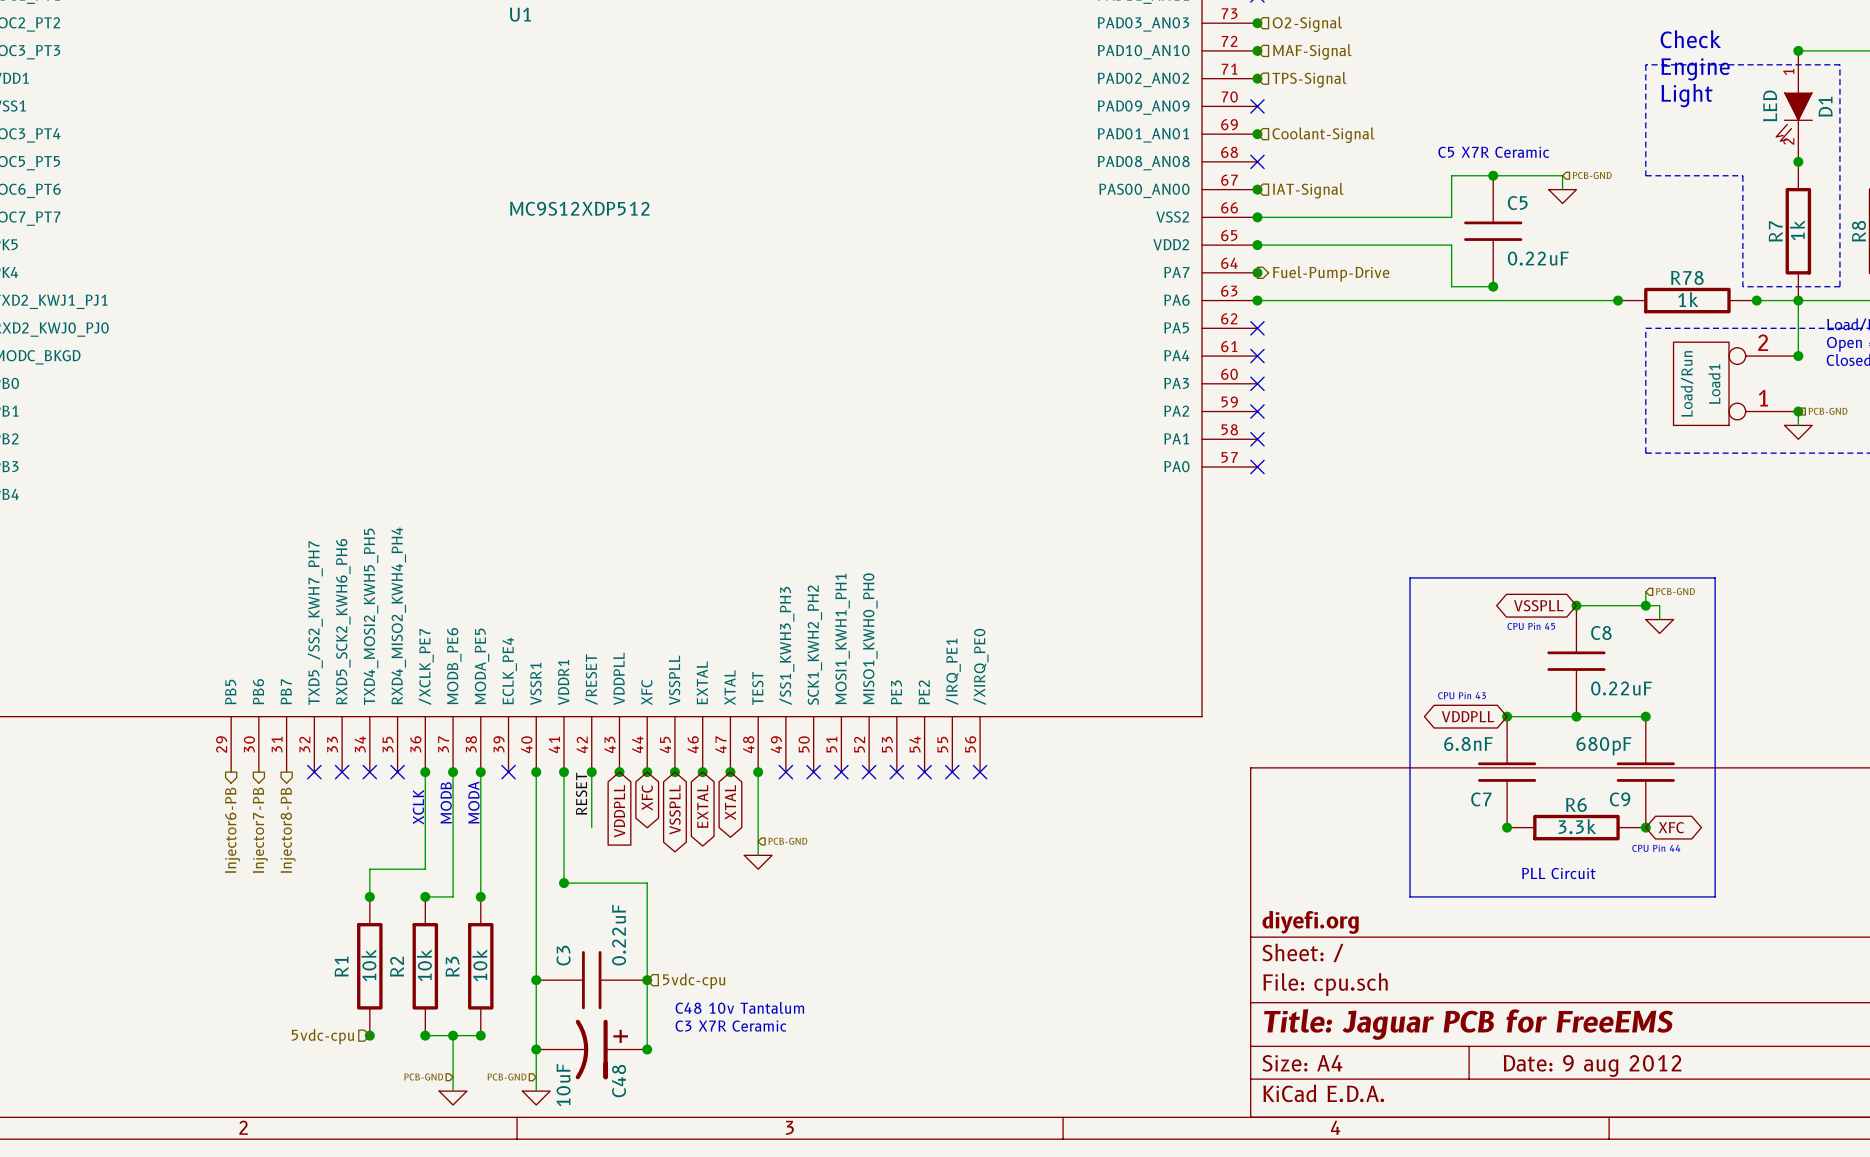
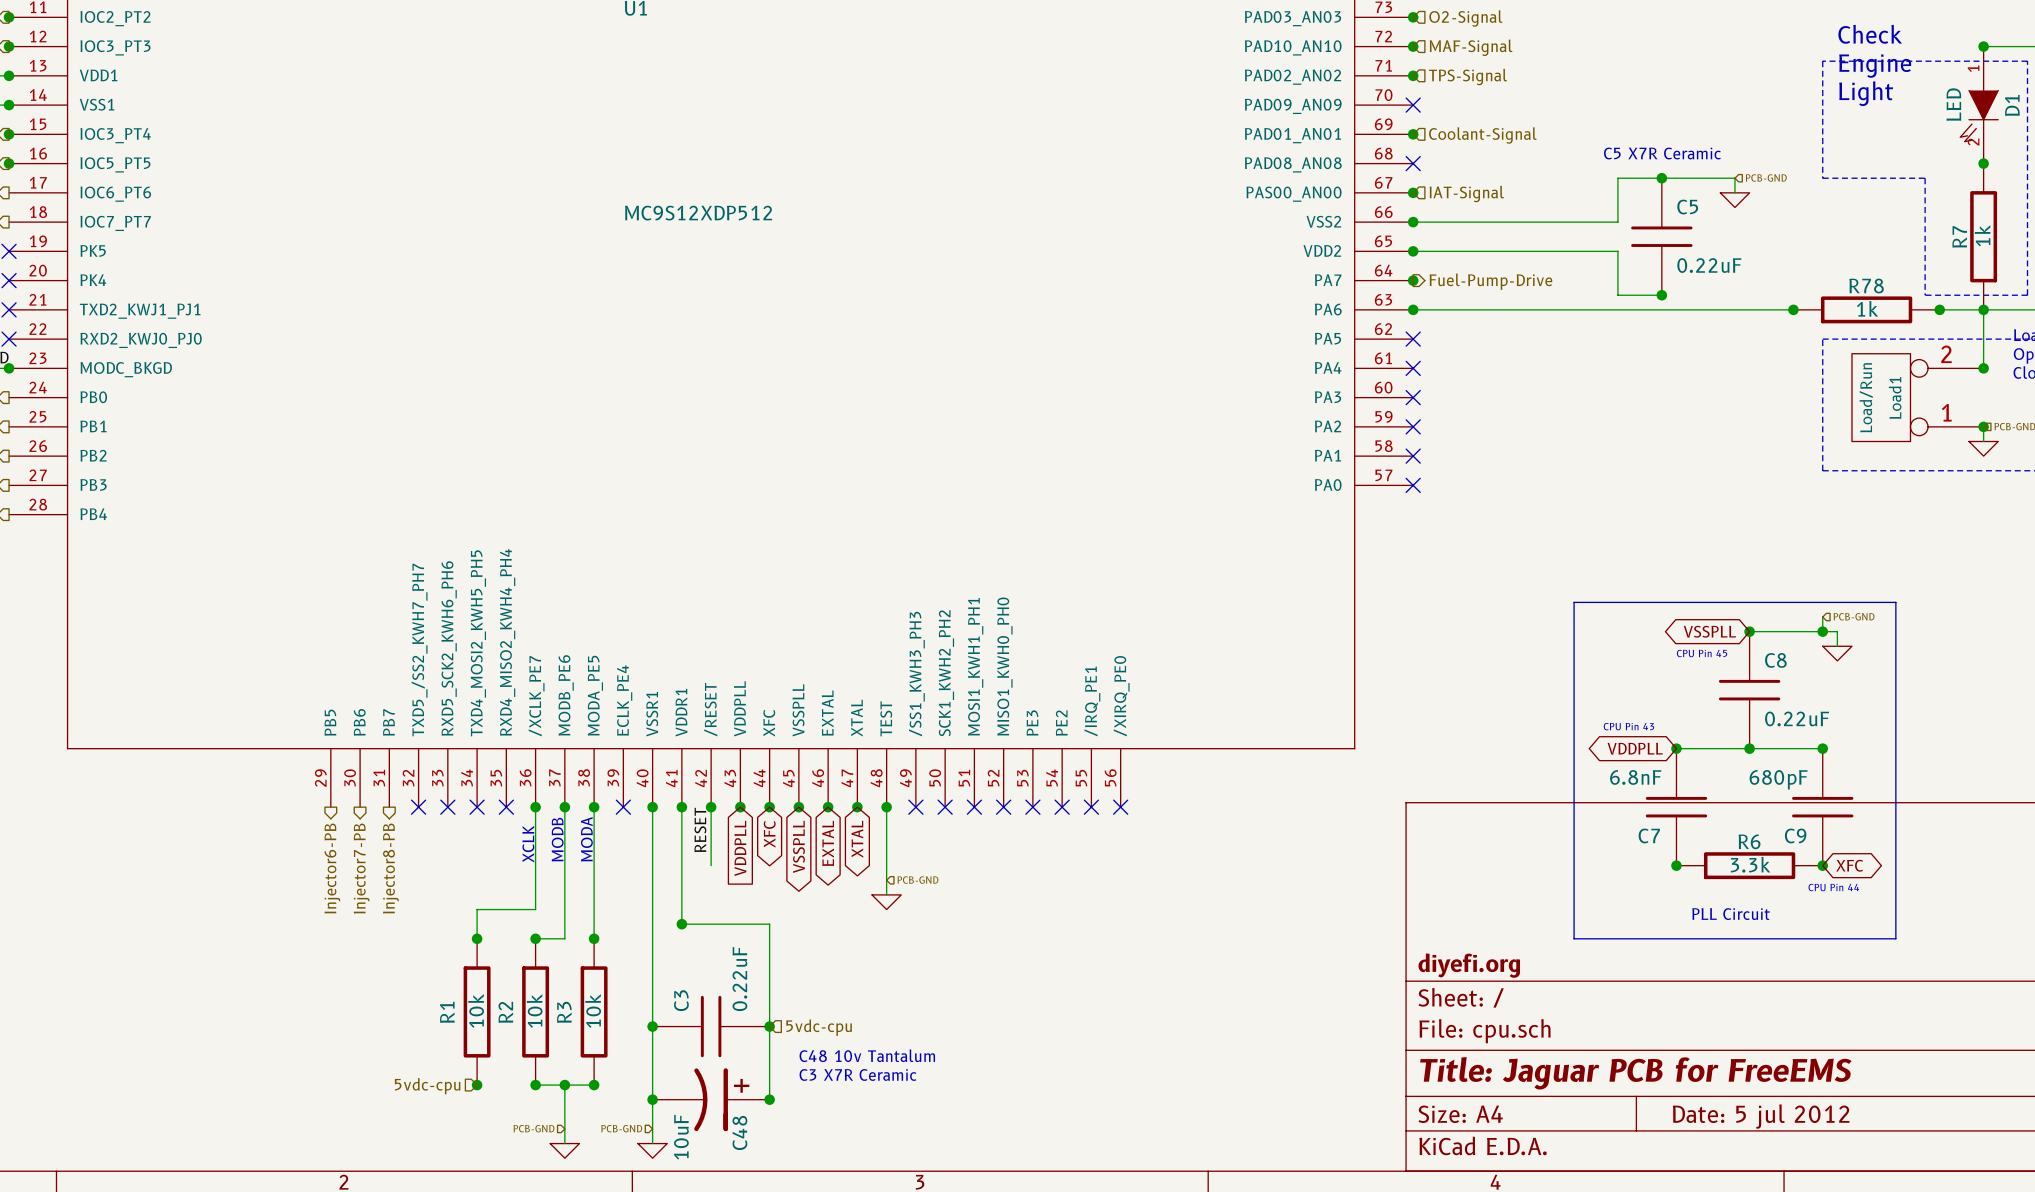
title block: Date: 9 aug 2012 (1592, 1066) -> Date: 5 jul 2012 (1761, 1116)

